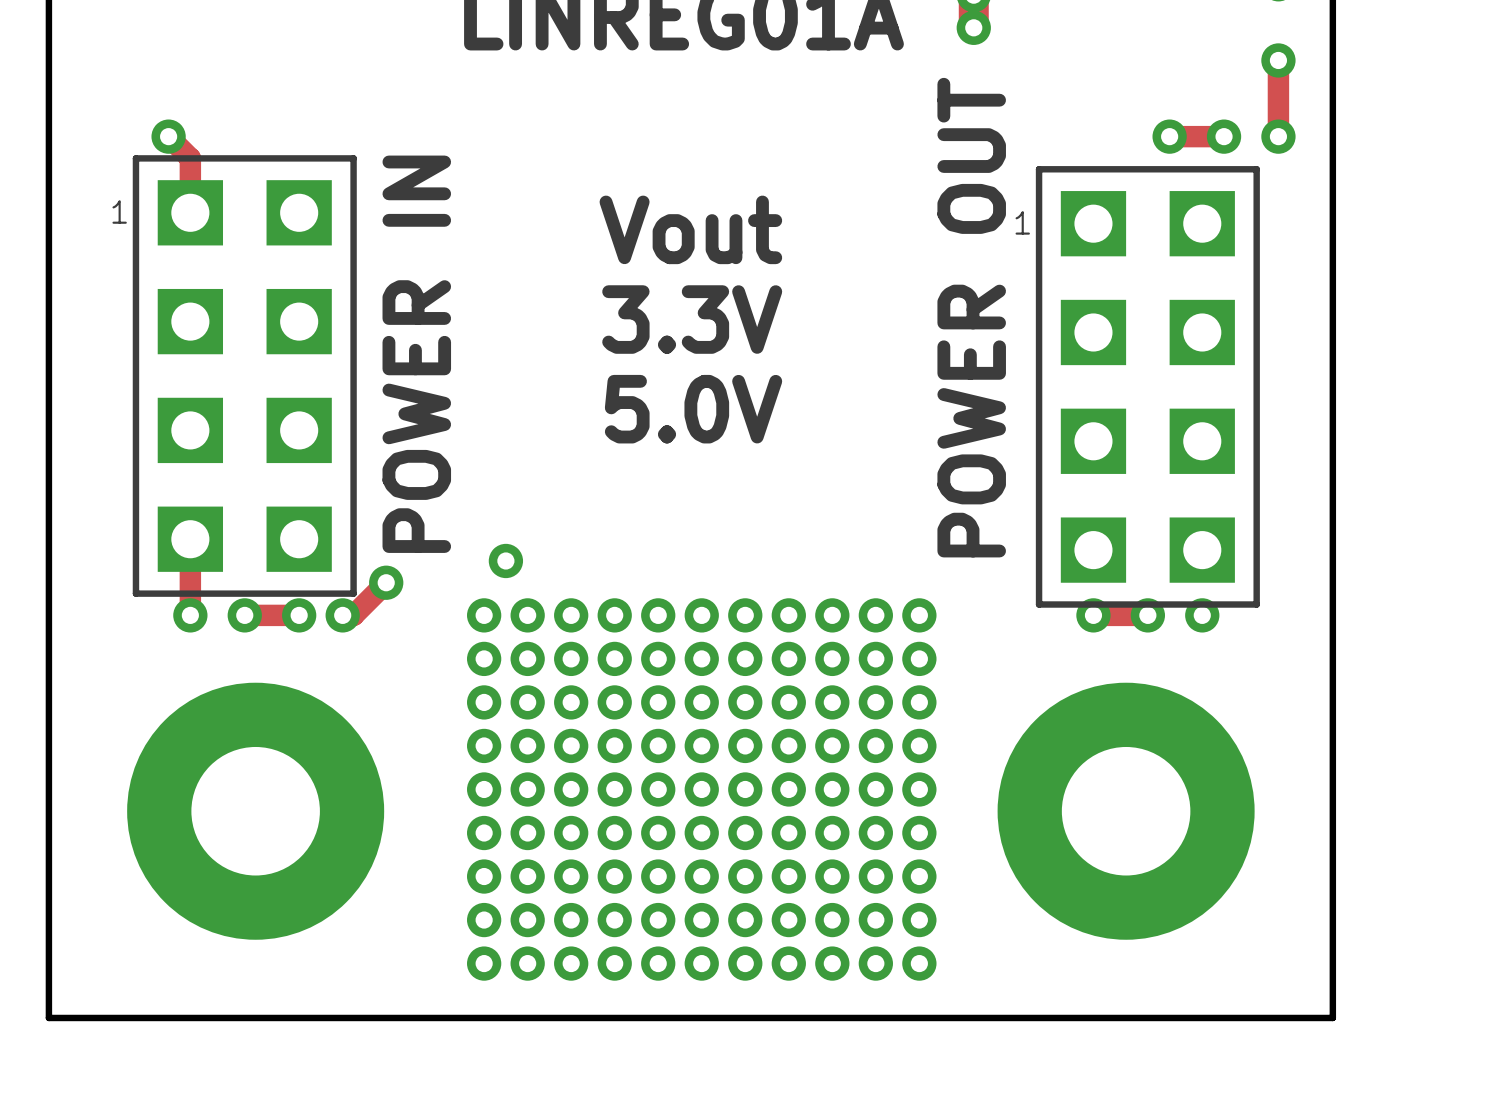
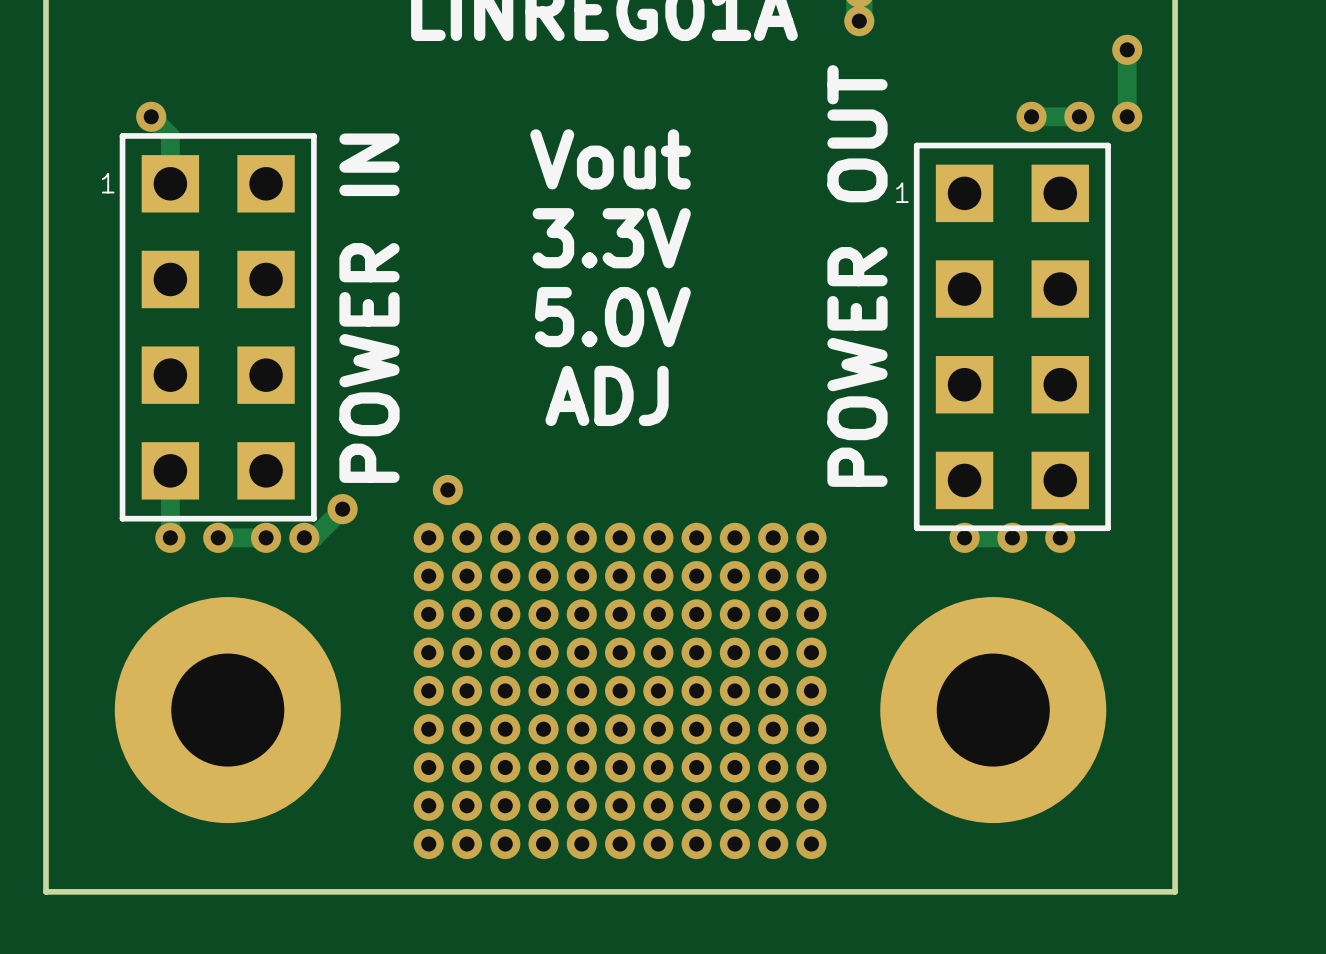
text position: Vout (690, 229) -> Vout (610, 159)
text position: 3.3V (692, 319) -> 3.3V (611, 238)
text position: 5.0V (693, 409) -> 5.0V (612, 317)
text: none -> ADJ (607, 395)

